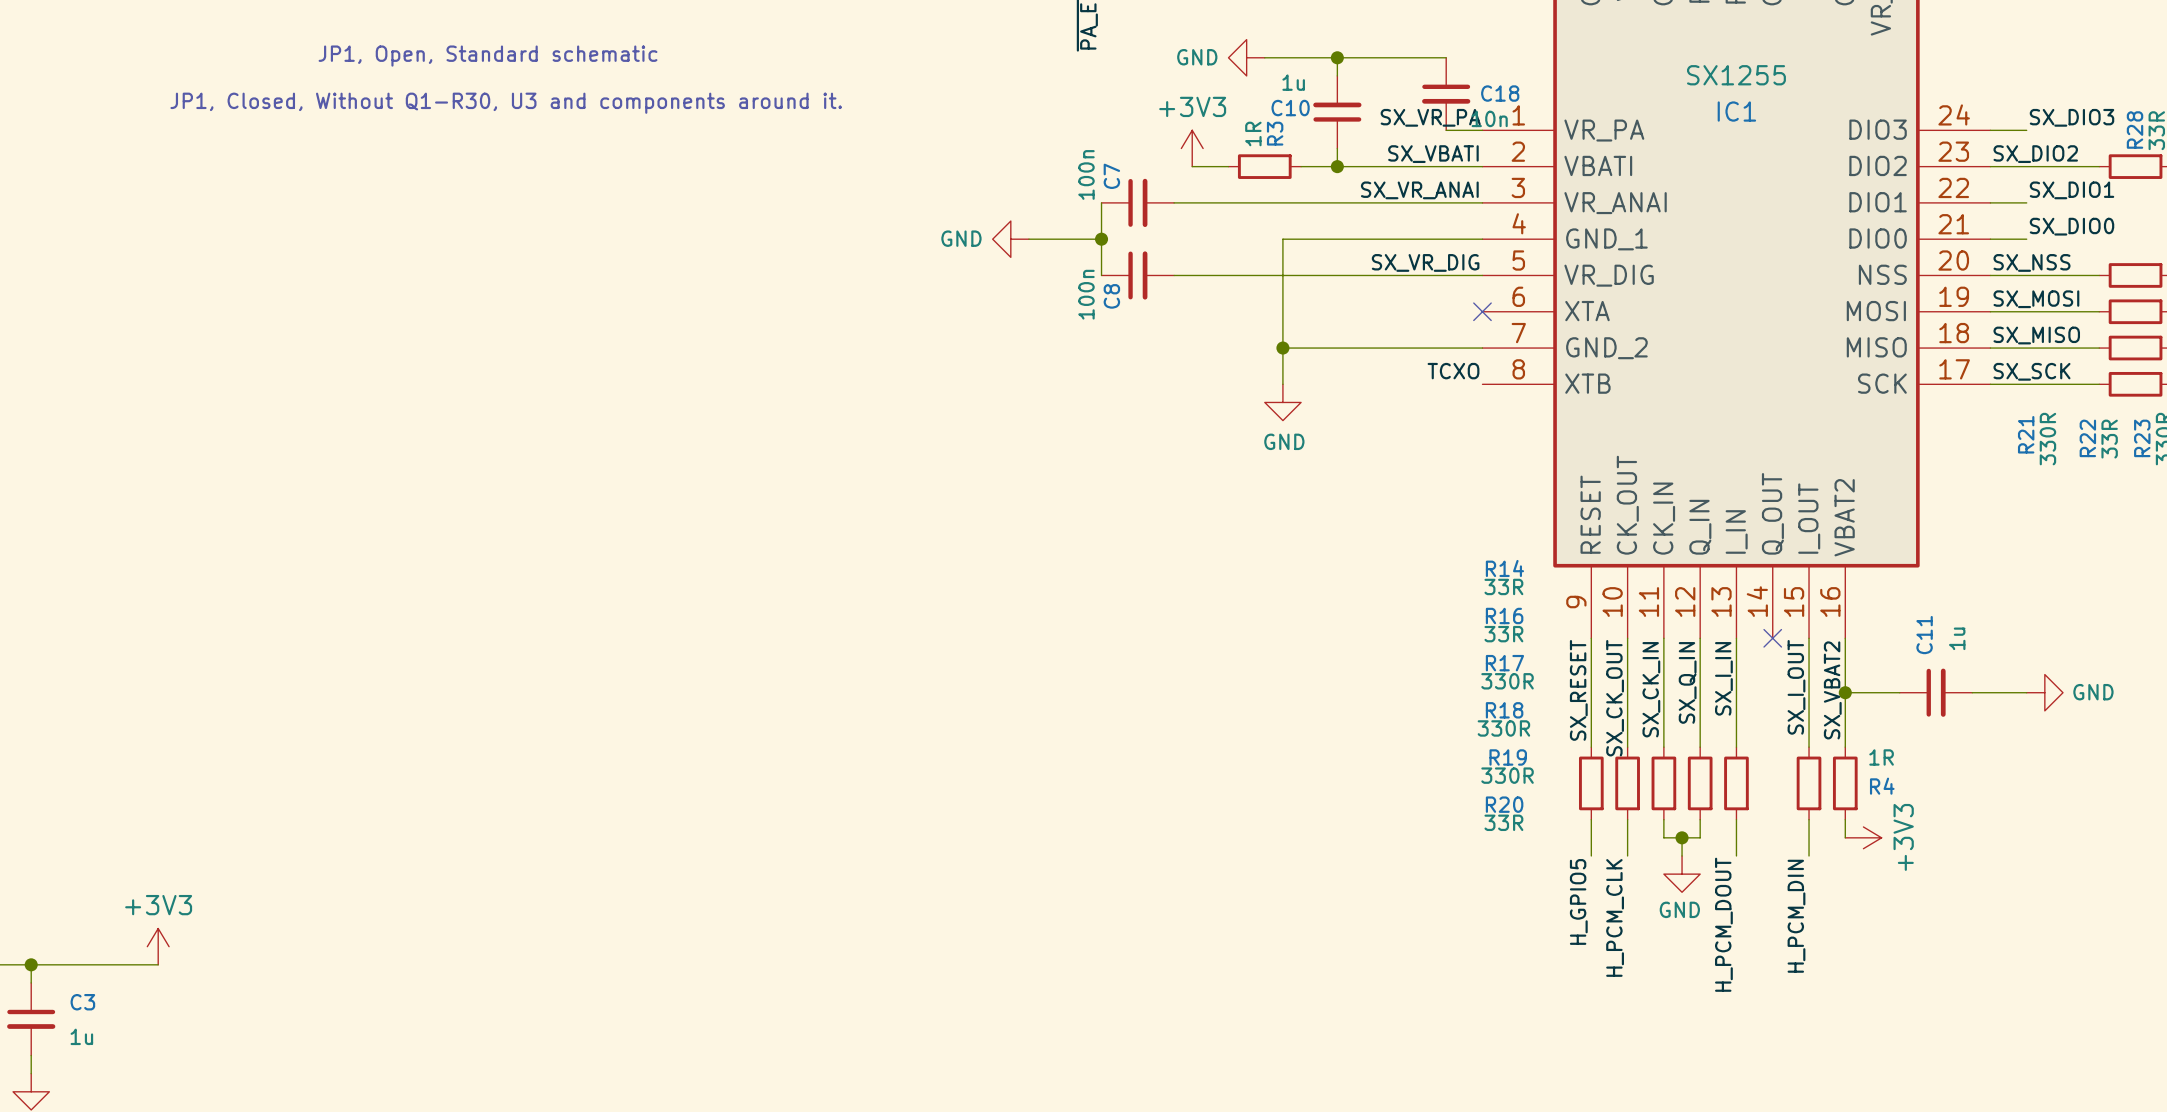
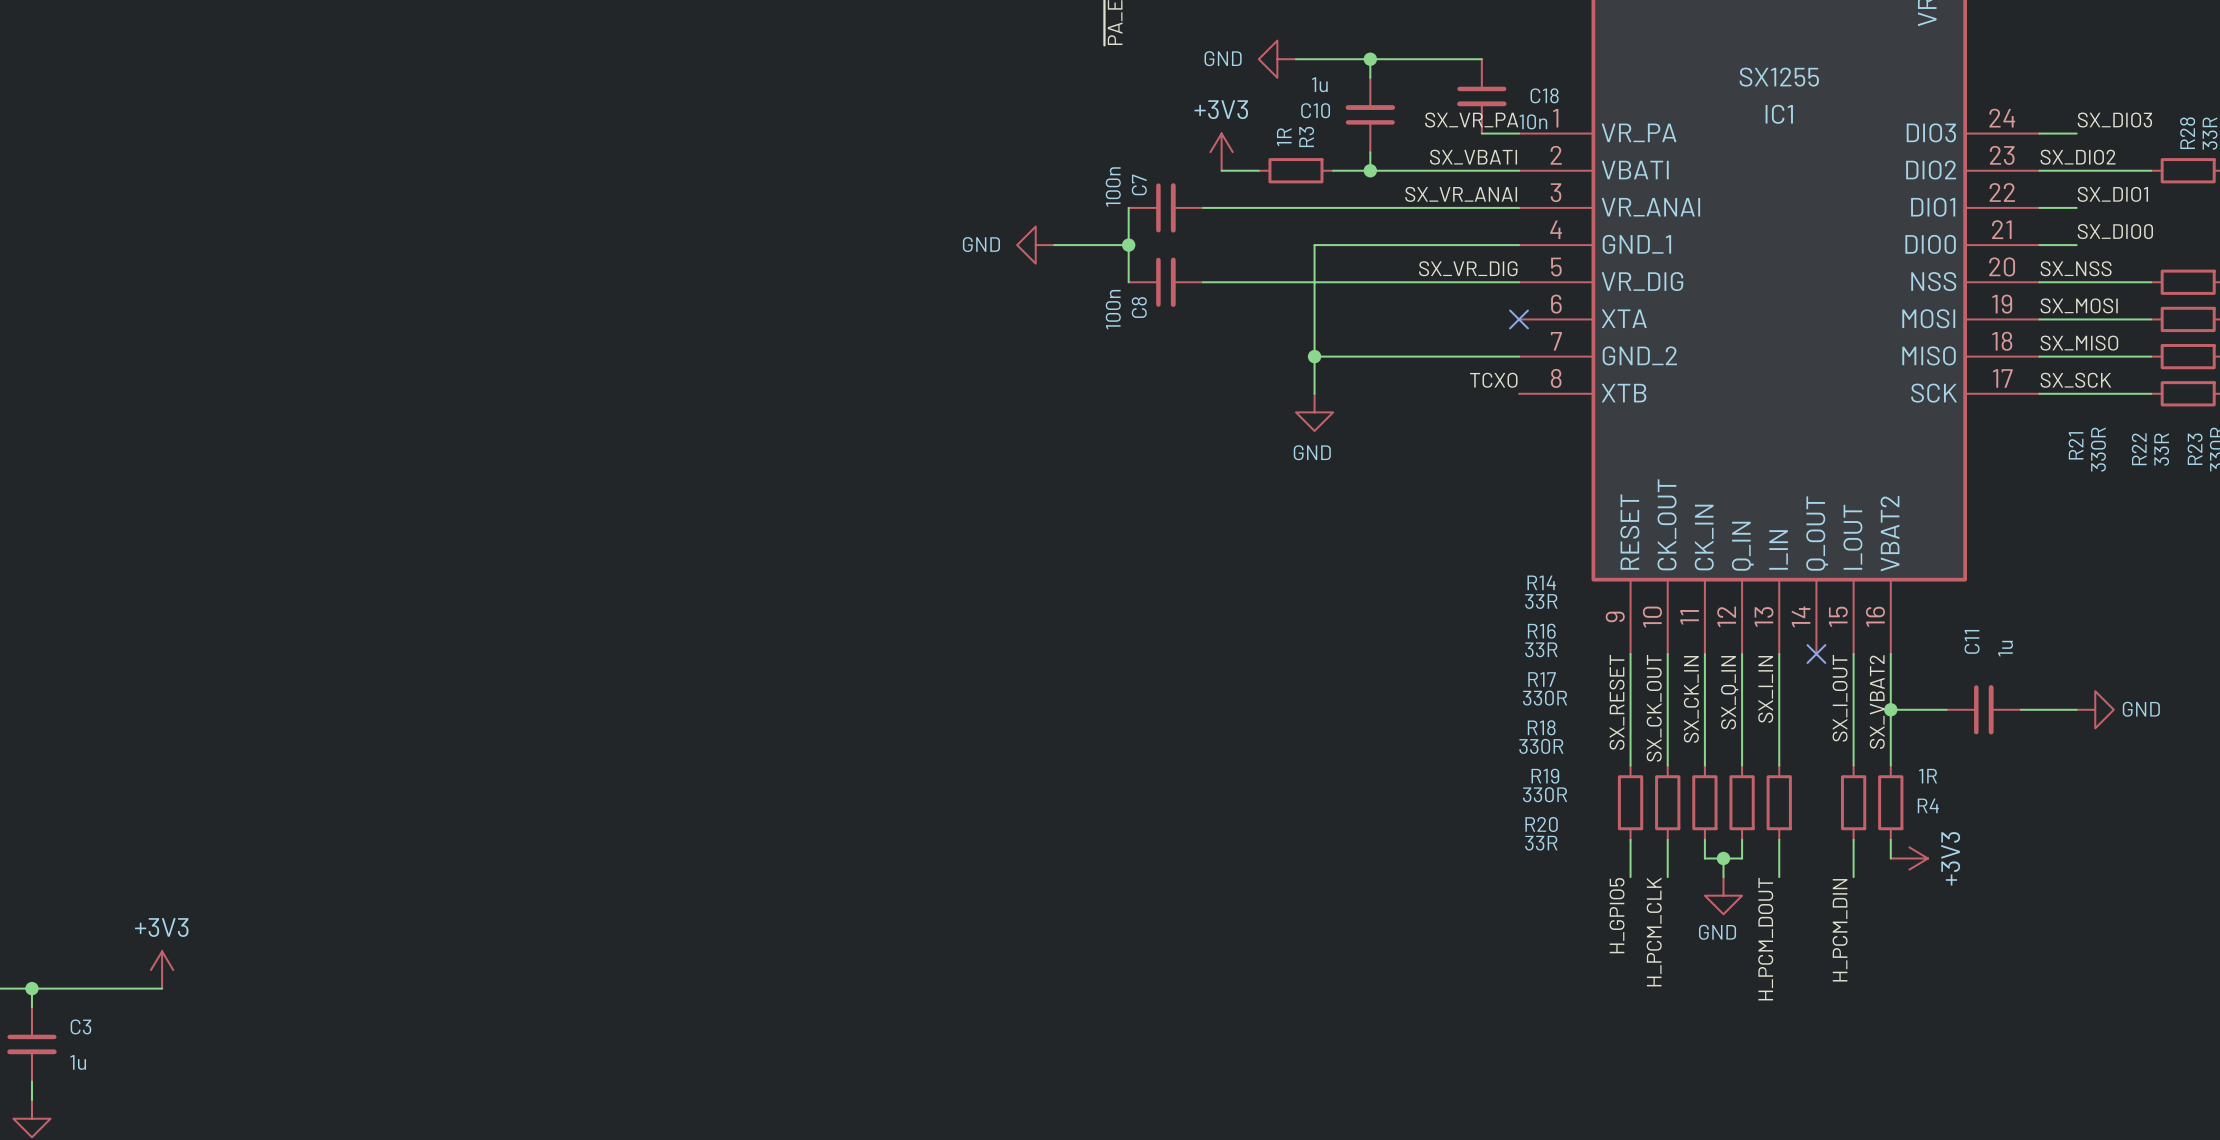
text: JP1, Open, Standard schematic (488, 56) -> none
text: JP1, Closed, Without Q1-R30, U3 and components around it. (506, 103) -> none

